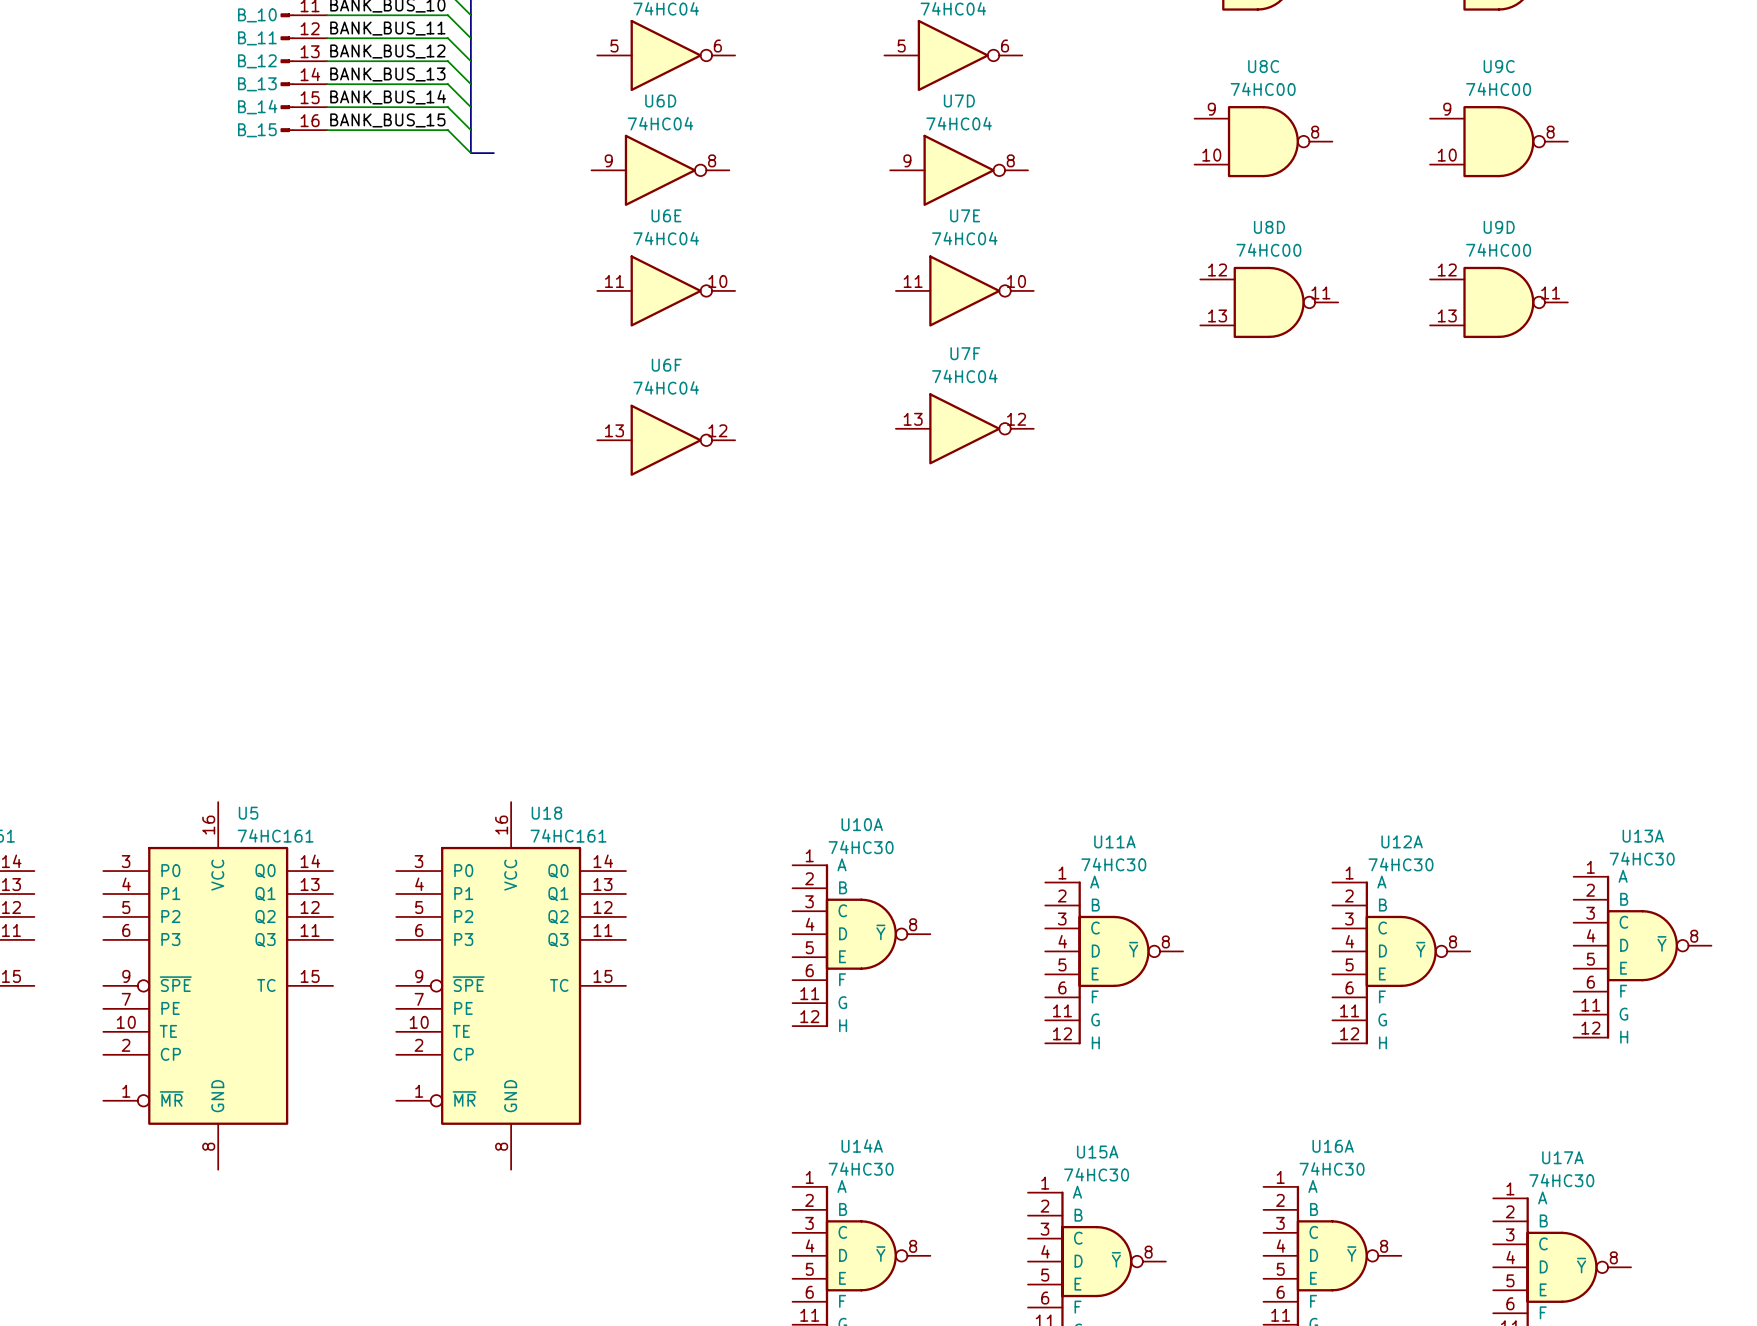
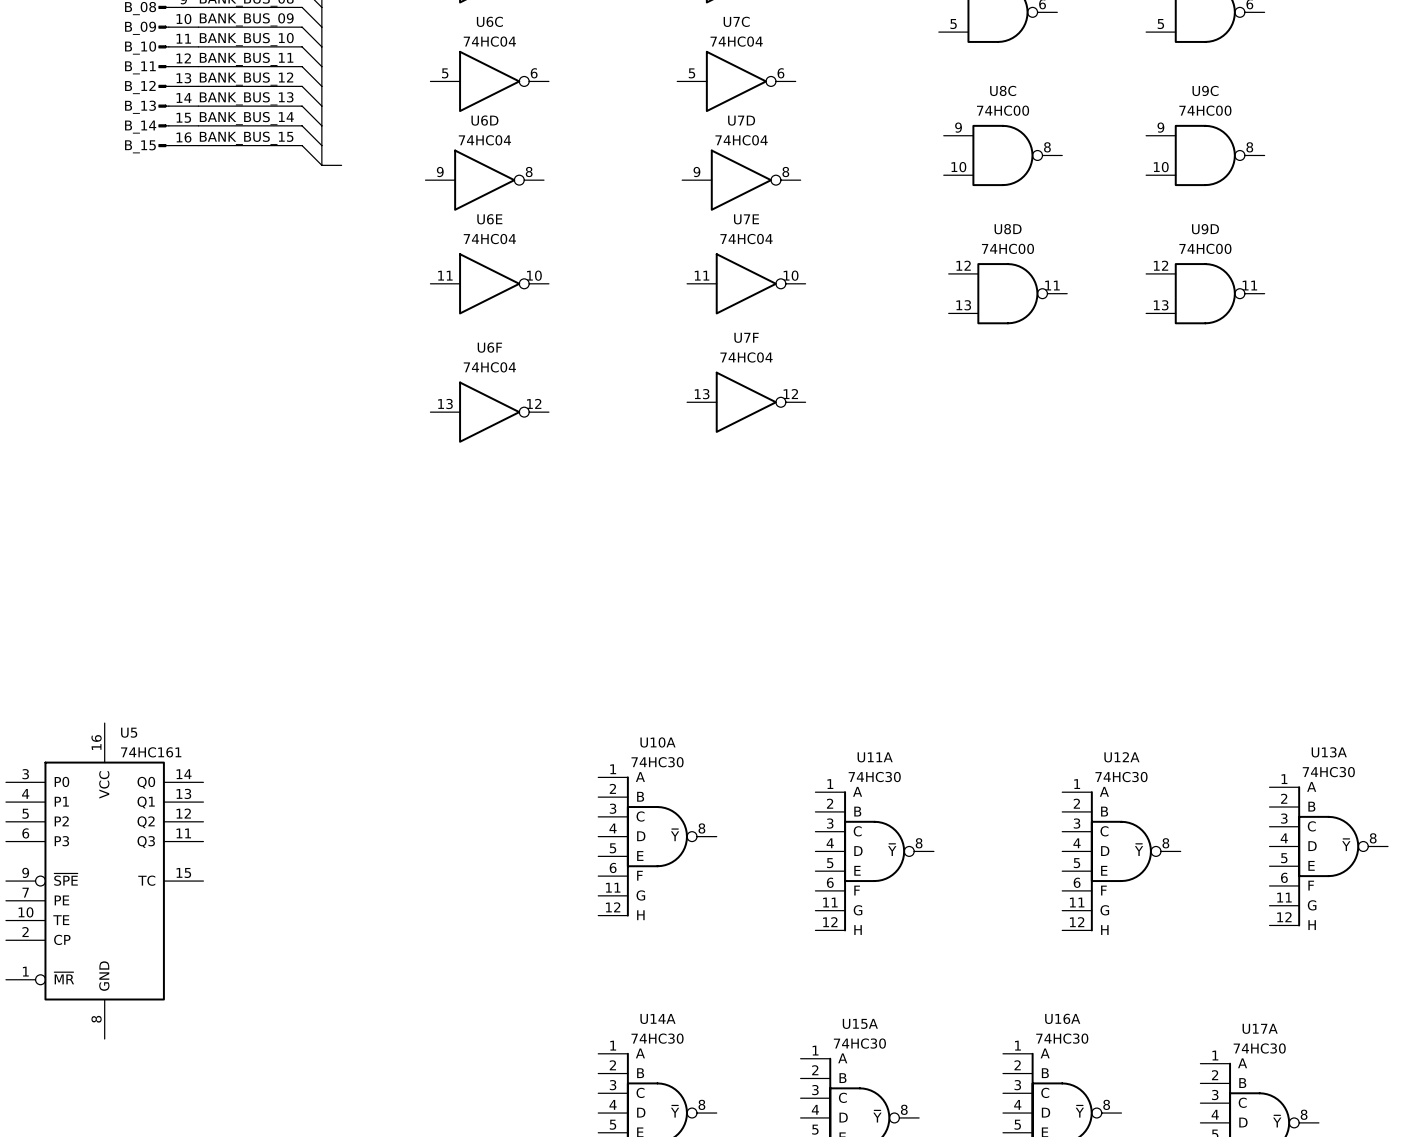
U18: 74HC161 (511, 985) -> none

